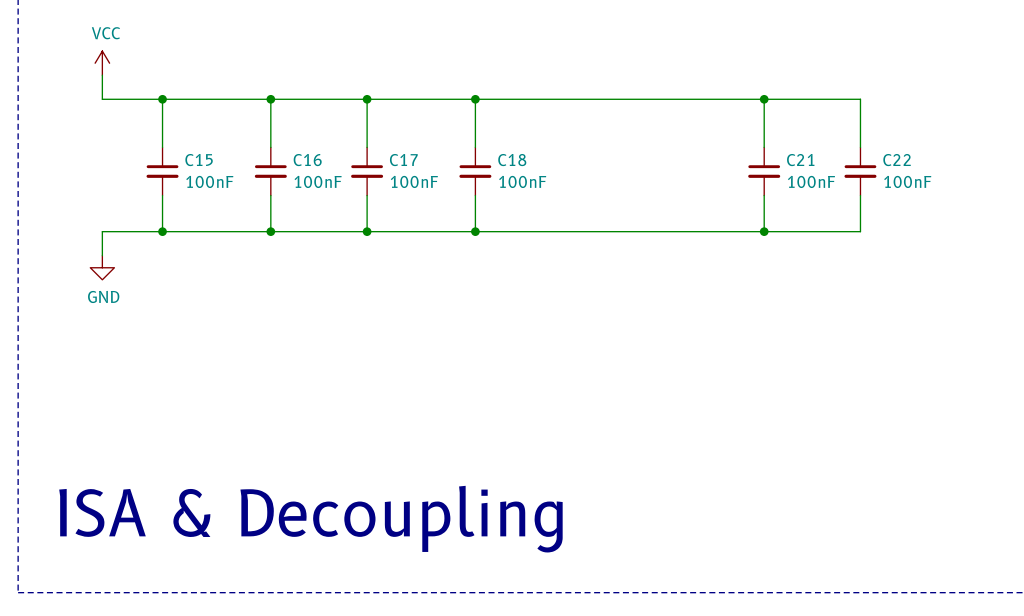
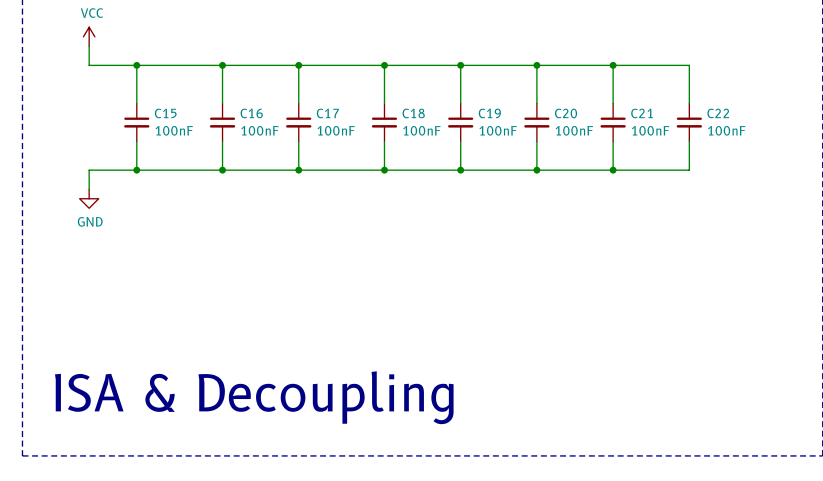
wire: none -> (460, 65) (460, 103)
junction: none -> (460, 65)
wire: none -> (536, 65) (536, 103)
junction: none -> (536, 65)
C19: none -> 100nF (460, 122)
C20: none -> 100nF (536, 122)
wire: none -> (460, 141) (460, 170)
wire: none -> (536, 141) (536, 170)
junction: none -> (460, 170)
junction: none -> (536, 170)

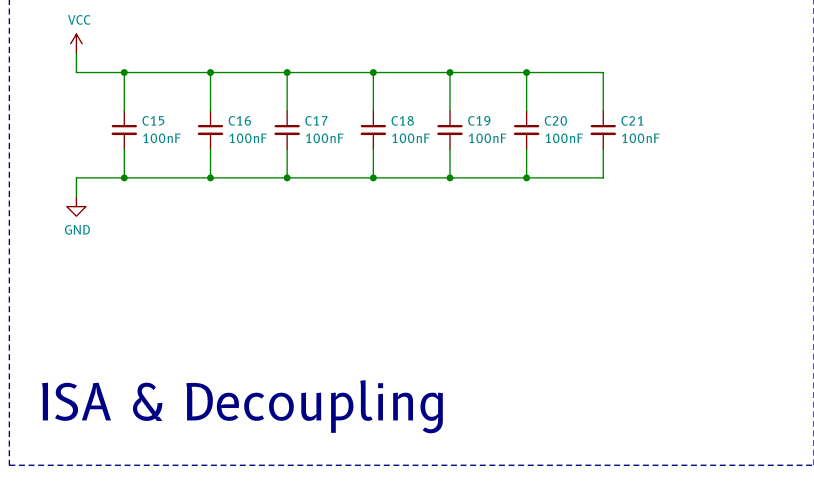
wire: (613, 65) (689, 65) (689, 103) -> none
junction: (613, 65) -> none
C22: 100nF (689, 122) -> none
wire: (689, 141) (689, 170) (613, 170) -> none
junction: (613, 170) -> none

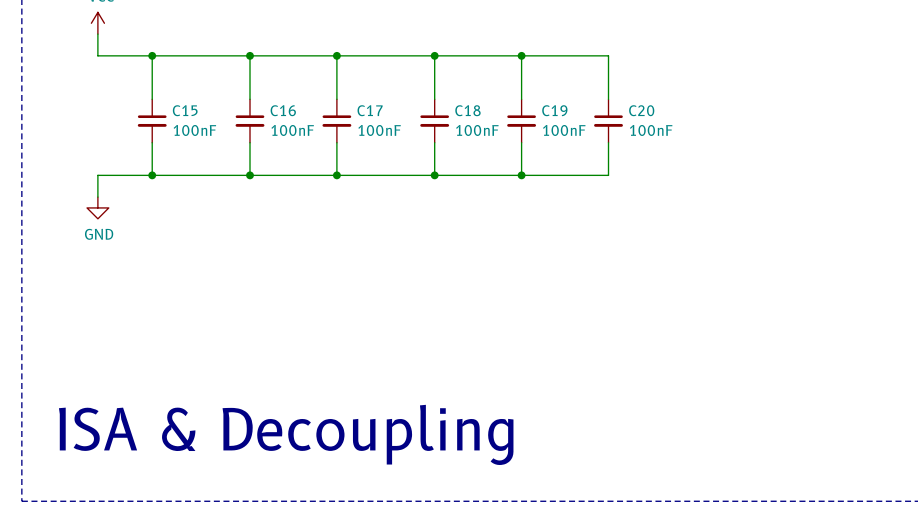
wire: (526, 72) (603, 72) (603, 110) -> none
junction: (526, 72) -> none
C21: 100nF (603, 129) -> none
wire: (603, 149) (603, 177) (526, 177) -> none
junction: (526, 177) -> none

